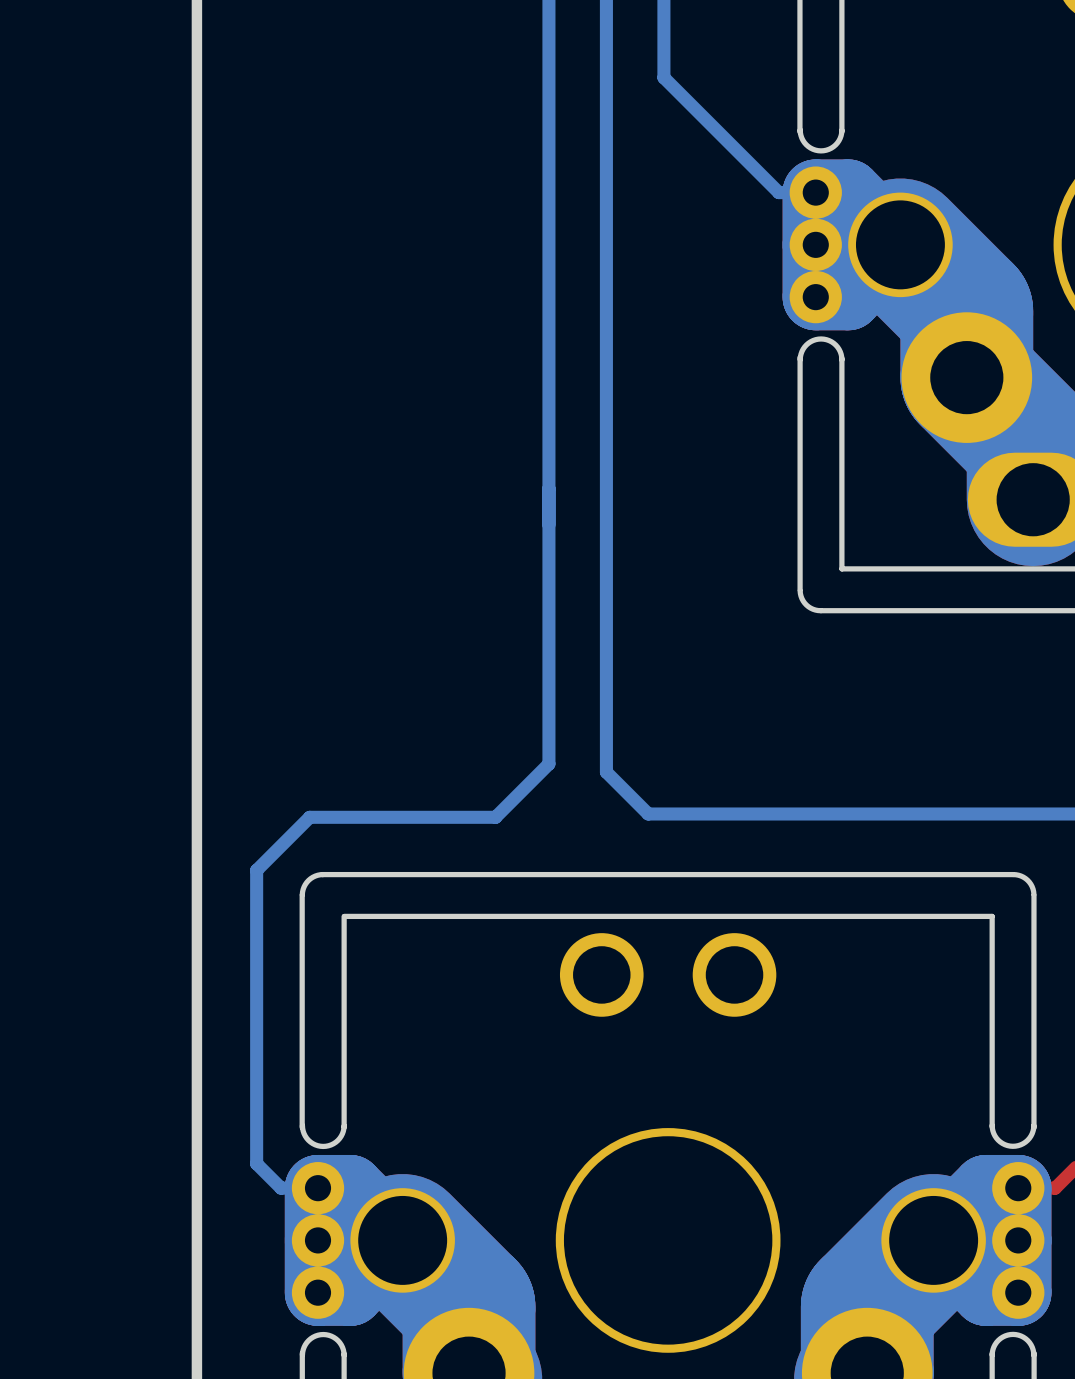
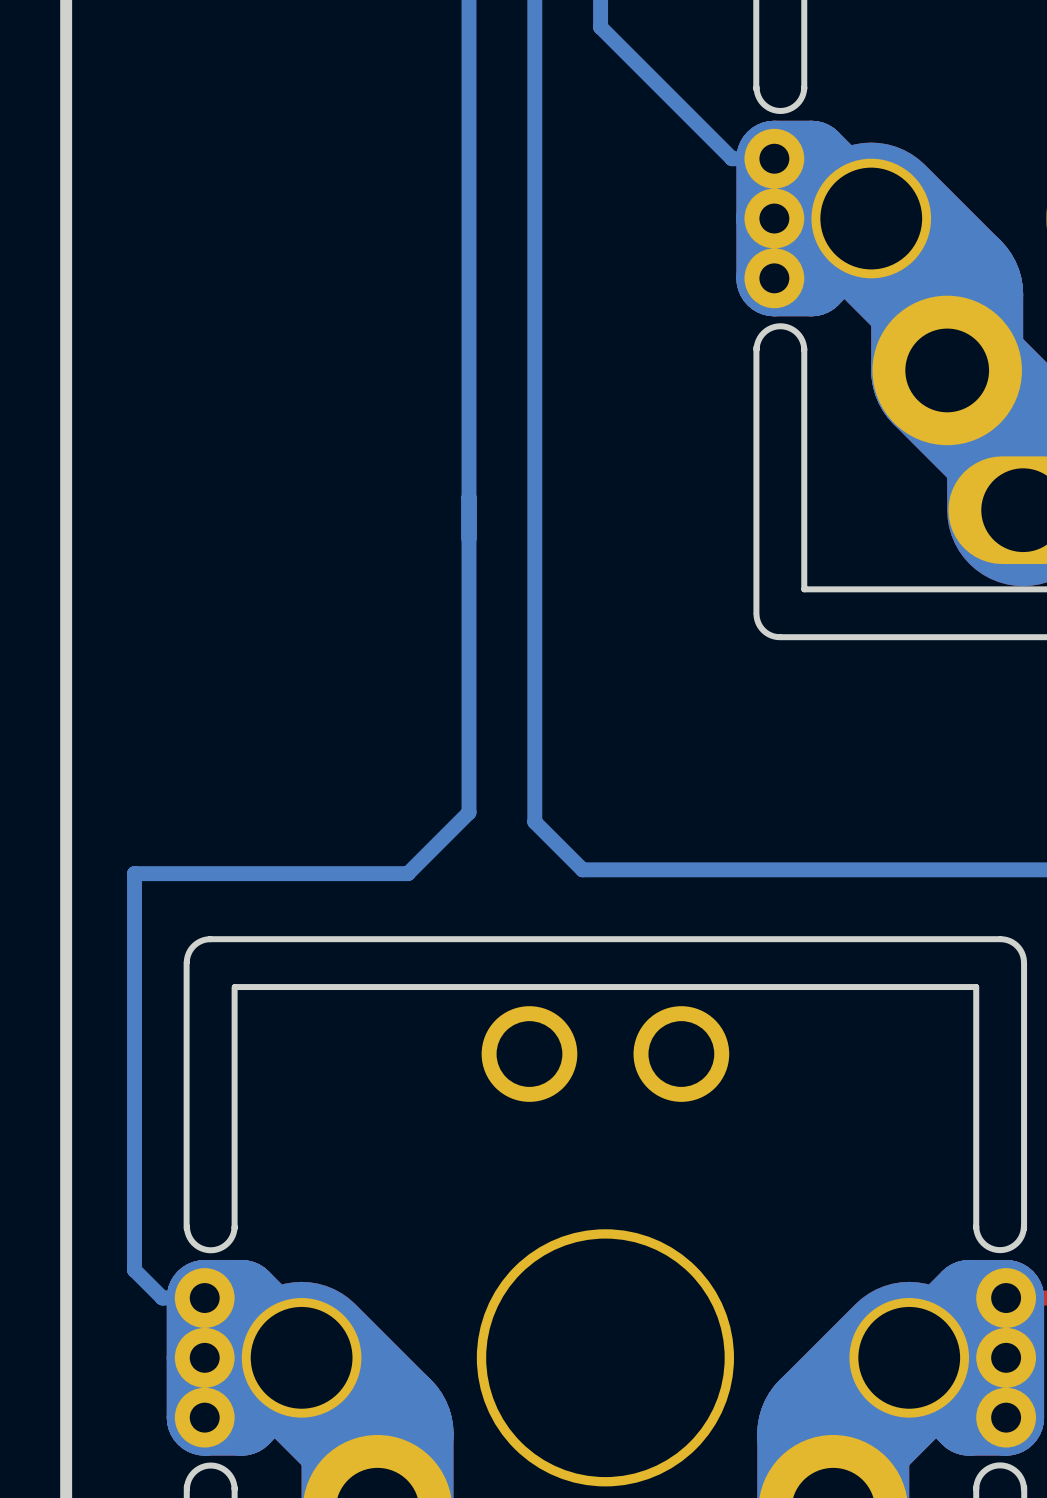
bottom track: (309, 817) (256, 870) -> (195, 873) (134, 873) (134, 934)

